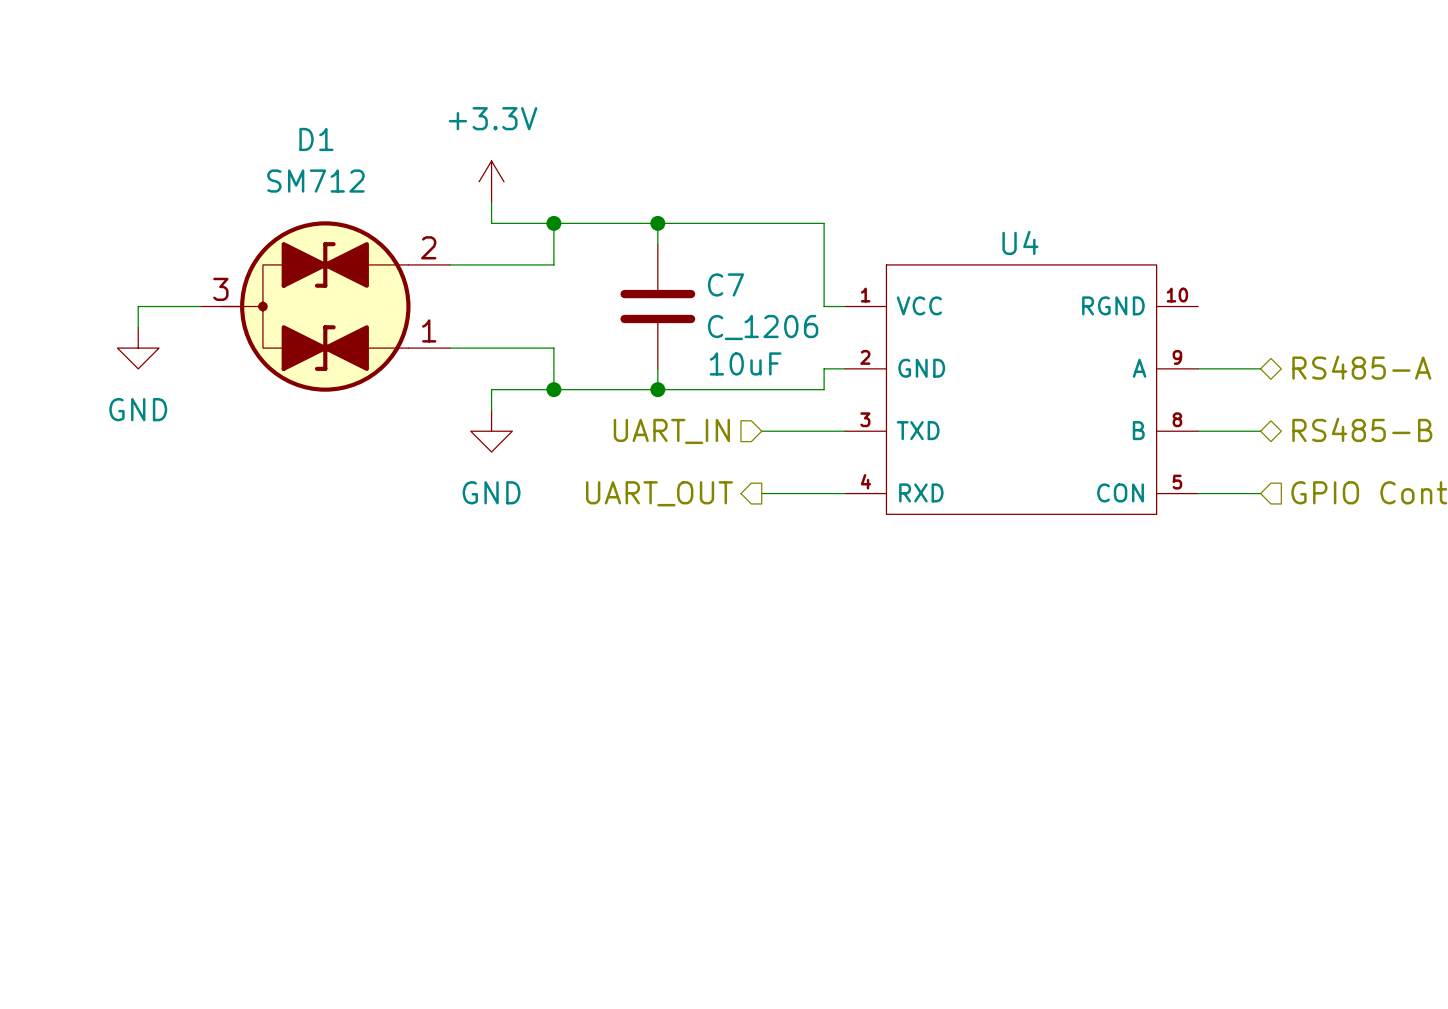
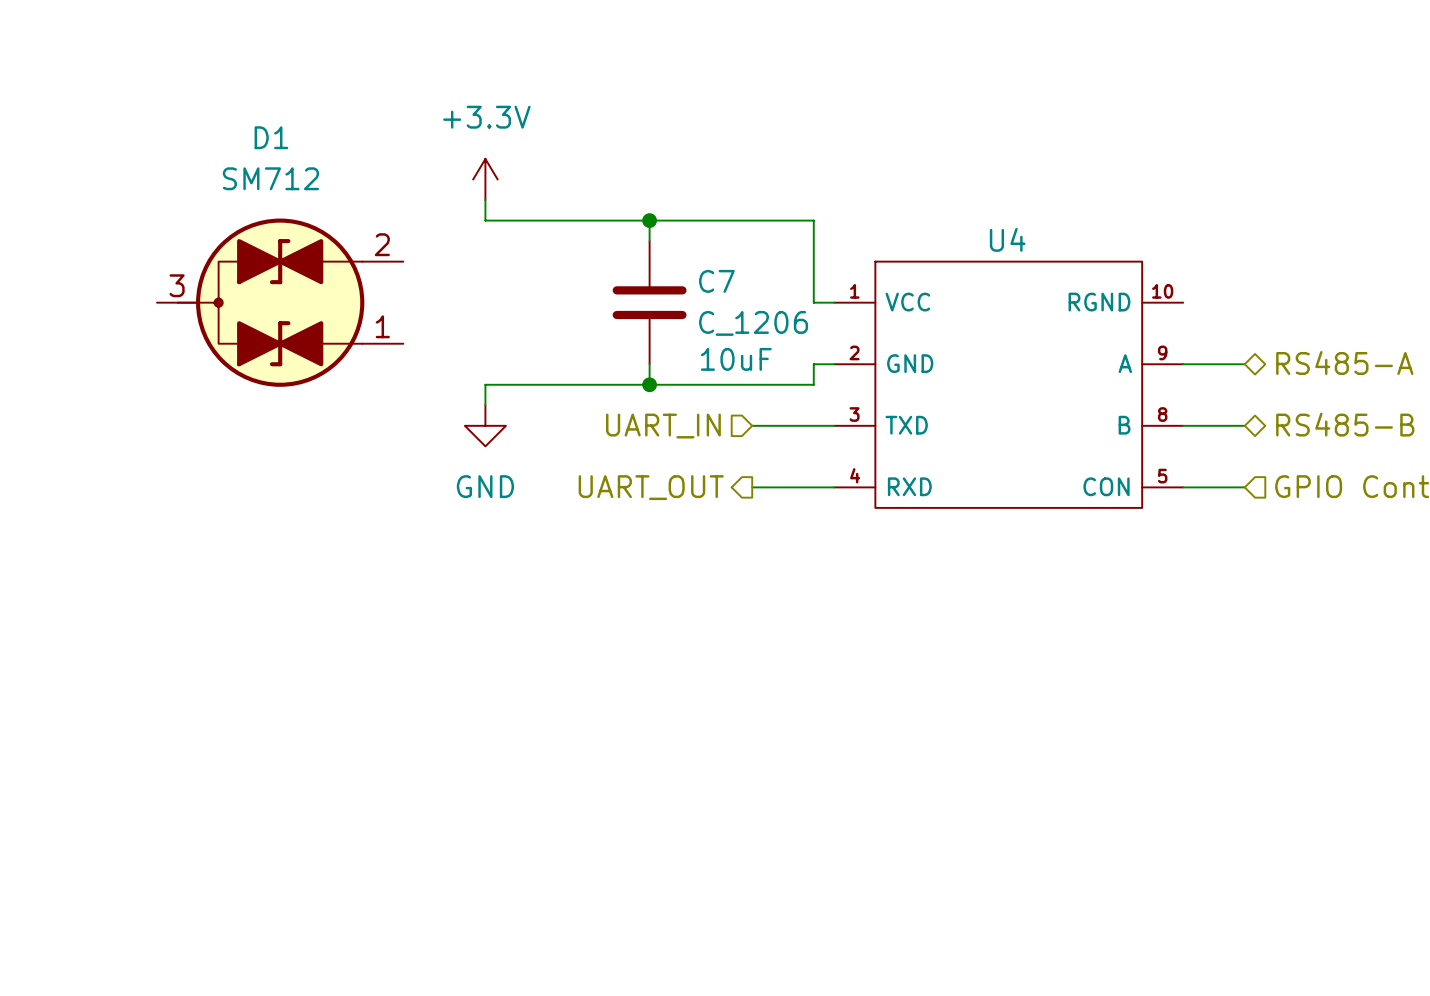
wire: (553, 223) (553, 264) (449, 264) -> none
junction: (553, 223) -> none
wire: (200, 306) (138, 306) (138, 327) -> none
D1 position: (325, 306) -> (280, 302)
power symbol: GND (138, 348) -> none
wire: (449, 348) (553, 348) (553, 389) -> none
junction: (553, 389) -> none

